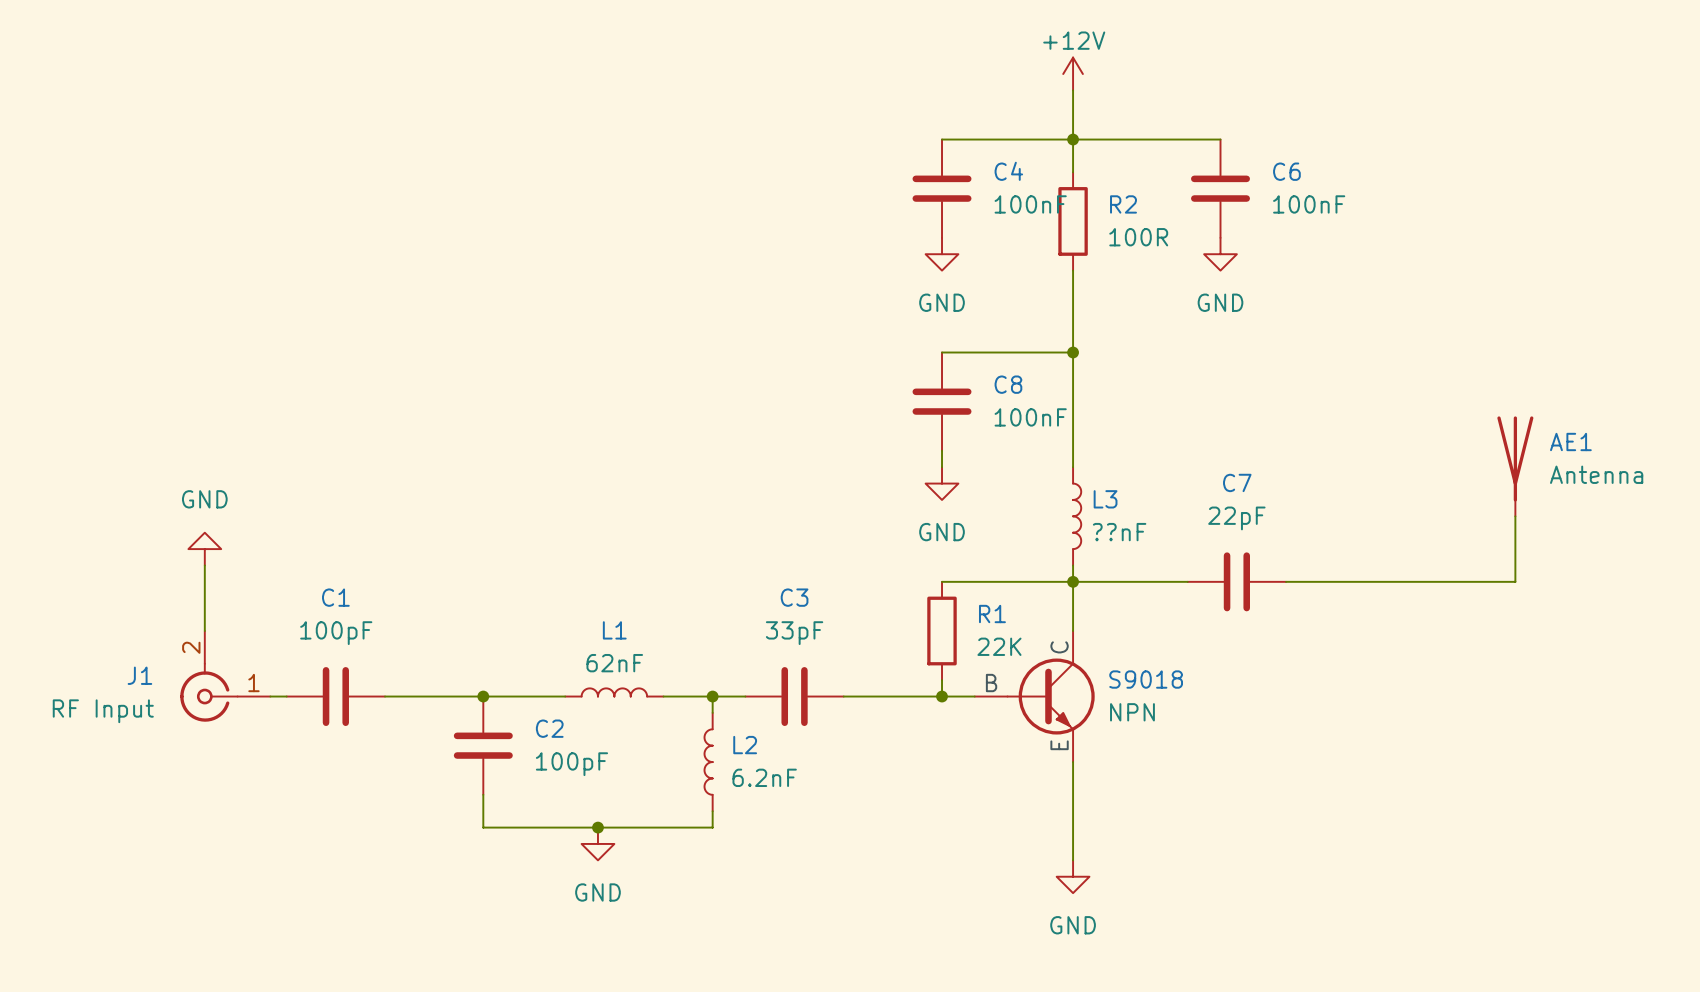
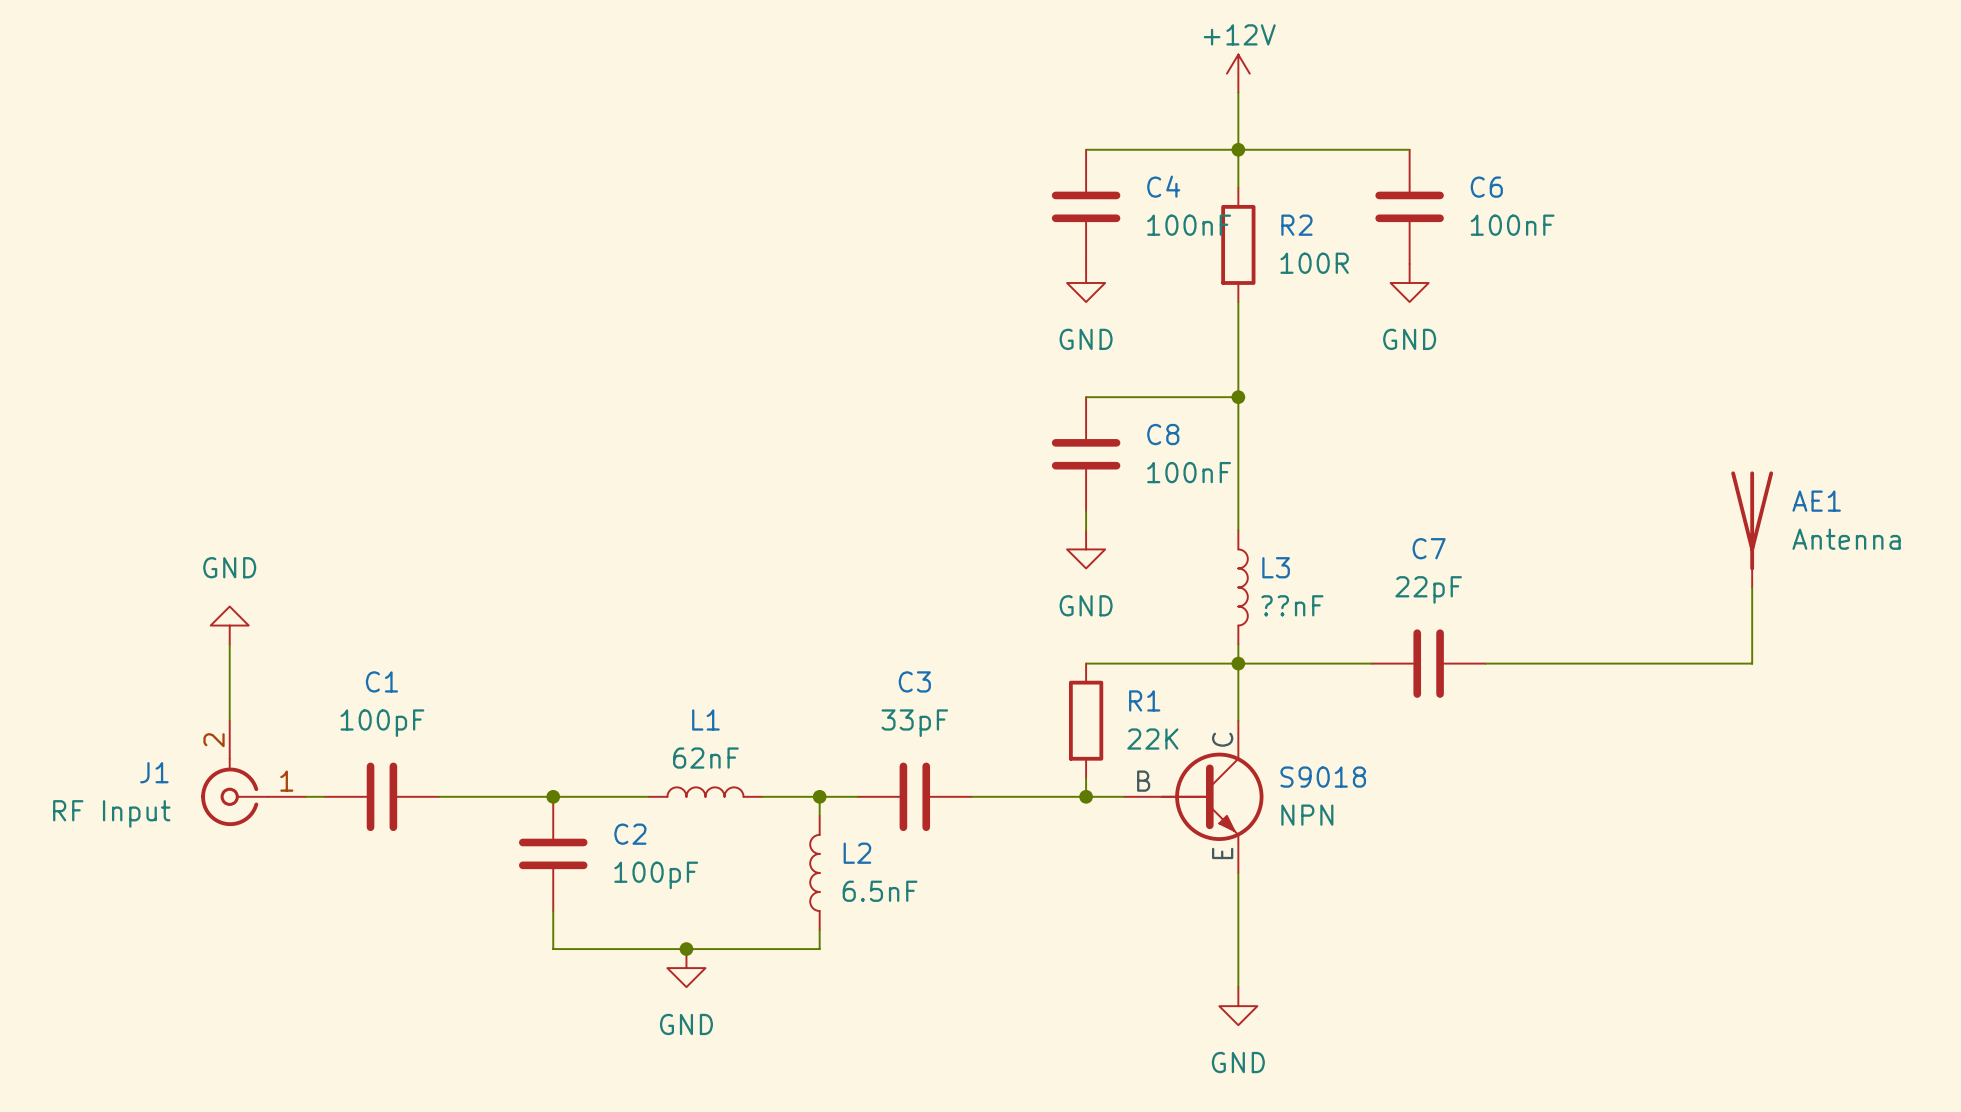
L2 value: 6.2nF (764, 777) -> 6.5nF (880, 891)

